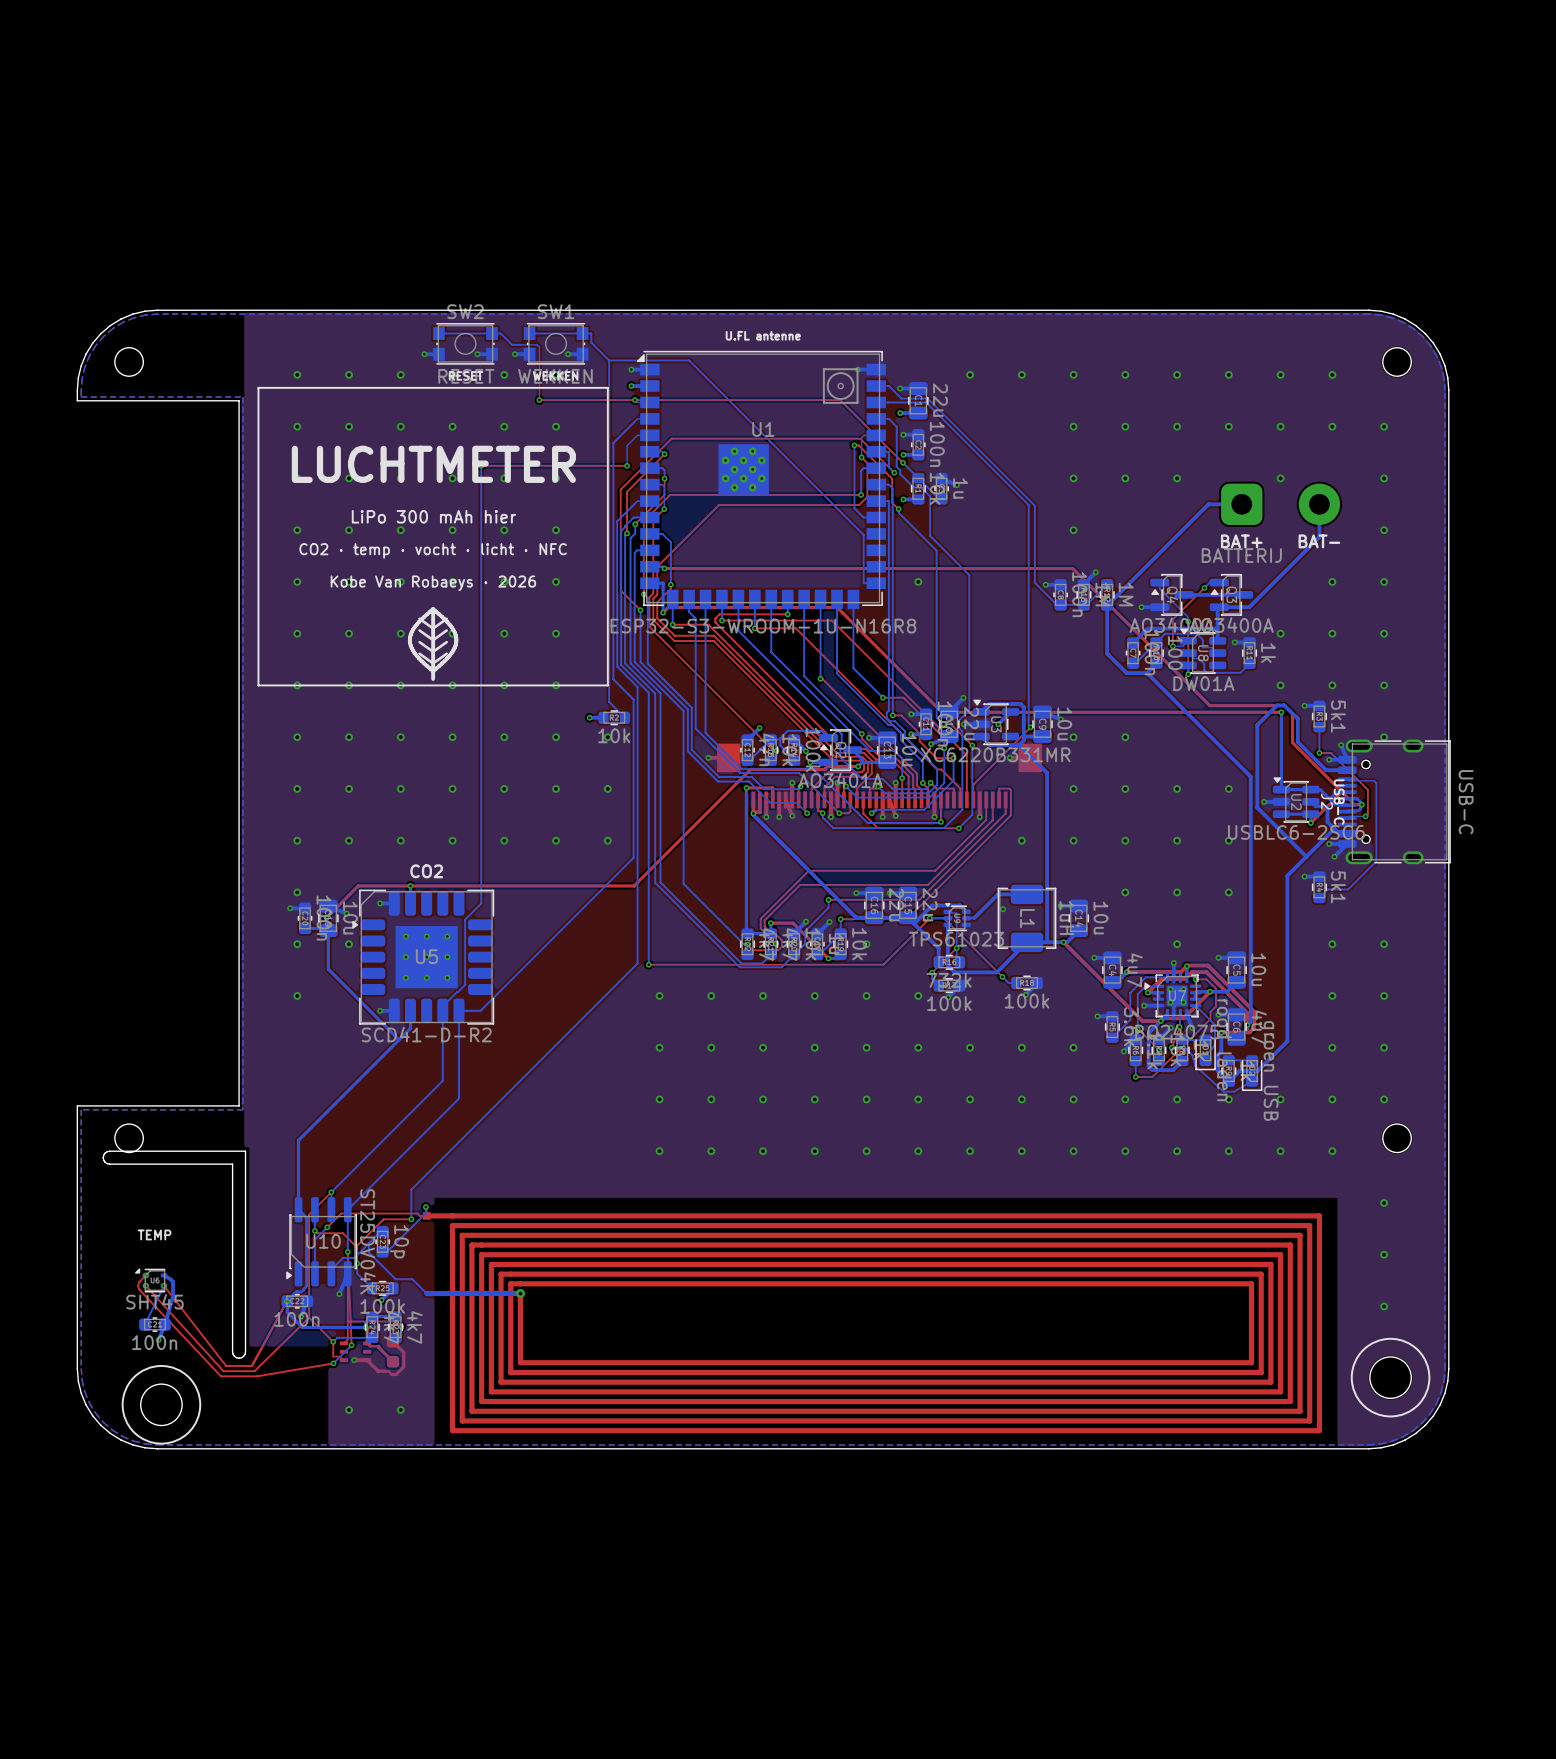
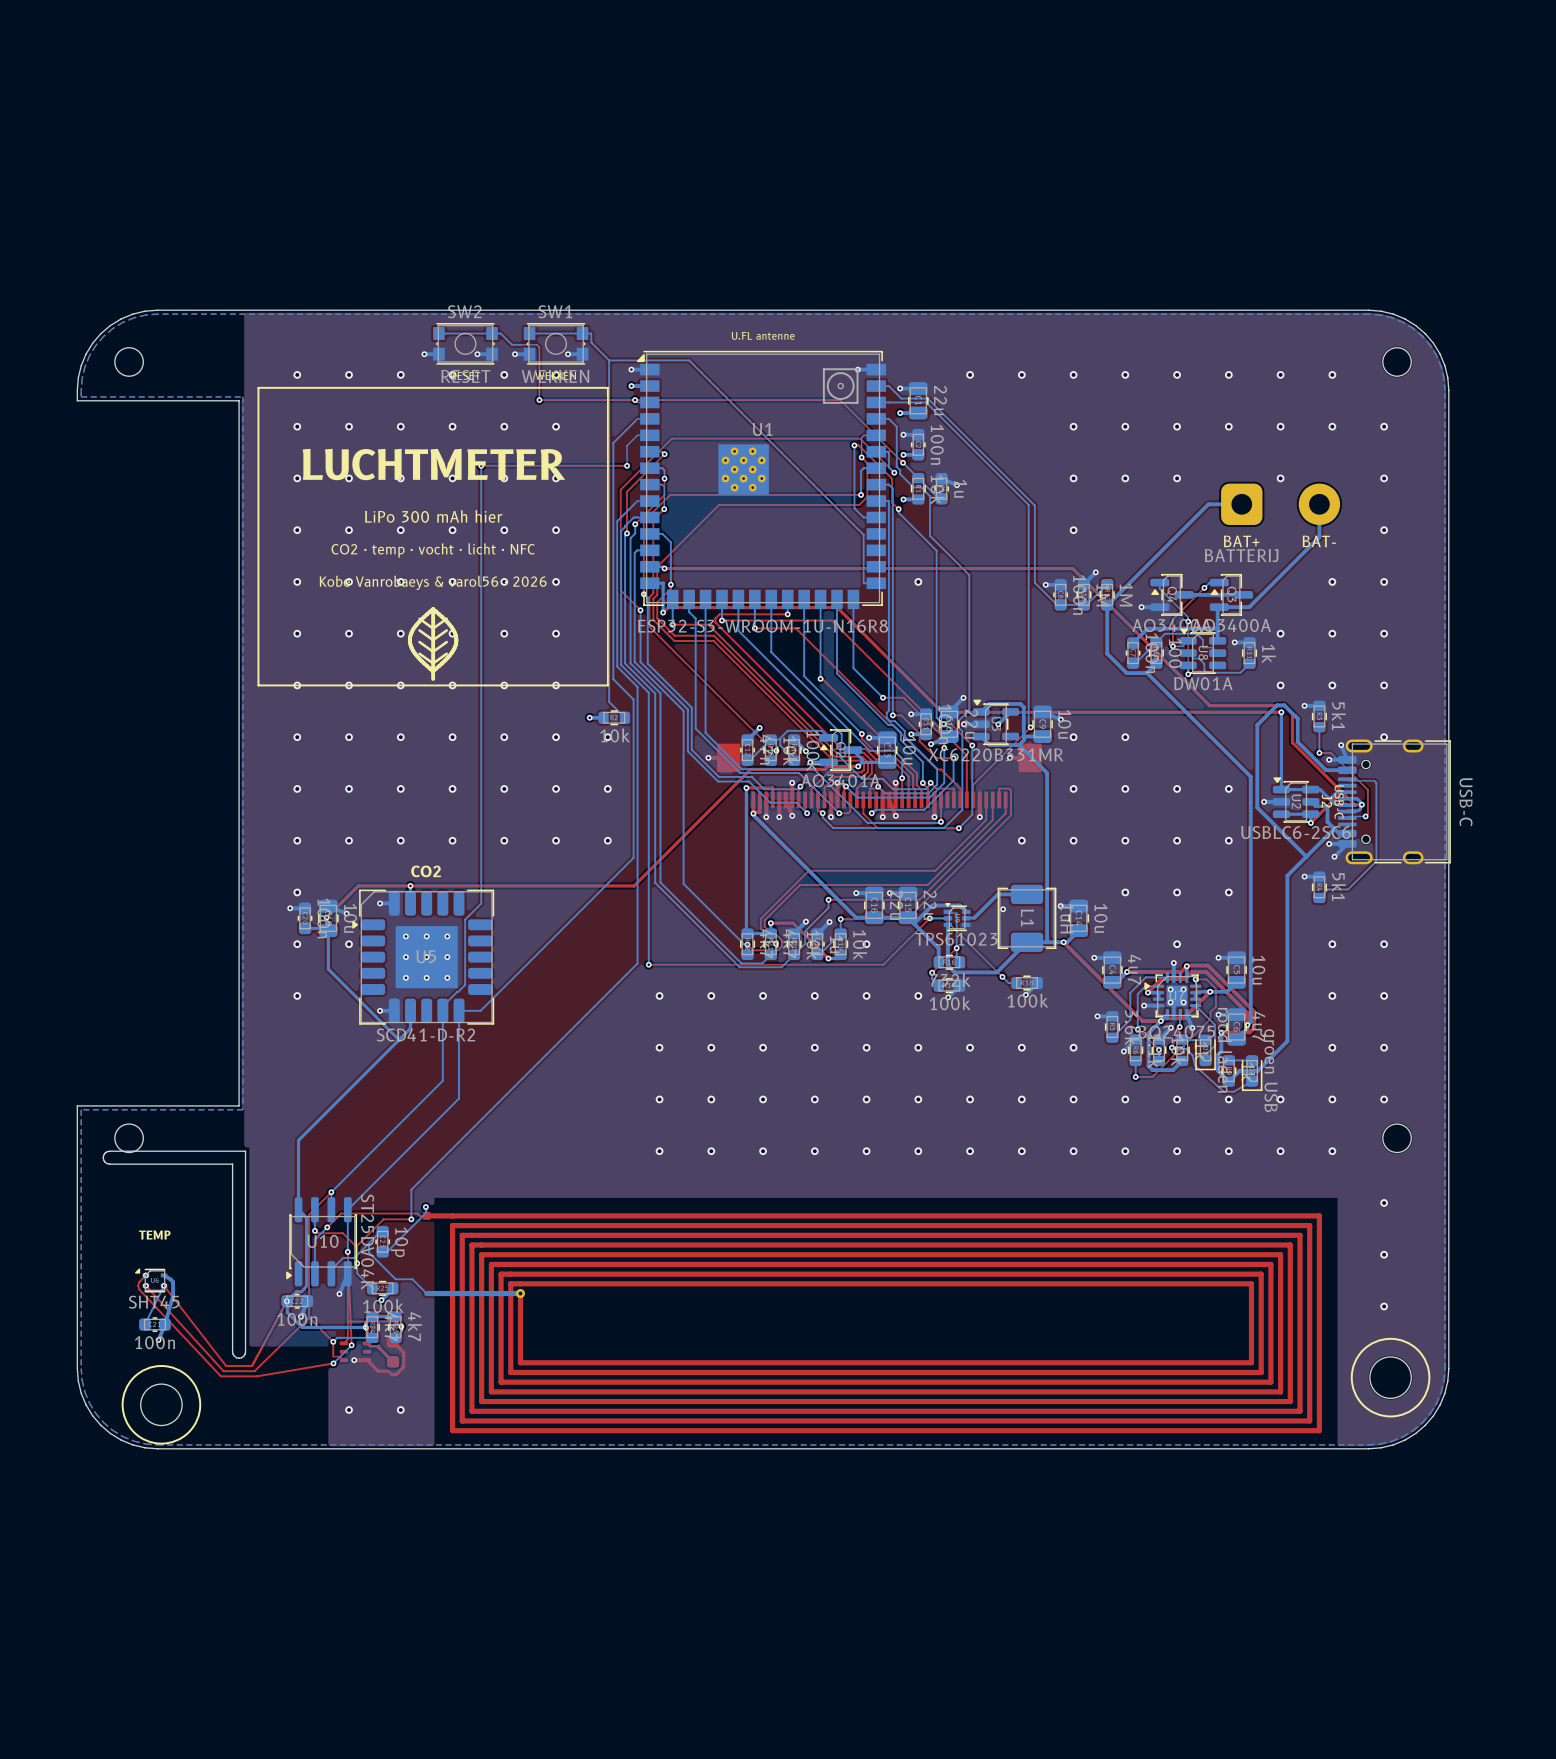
text: Kobe Van Robaeys · 2026 (433, 583) -> Kobe Vanrobaeys & varol56 · 2026 (433, 582)

